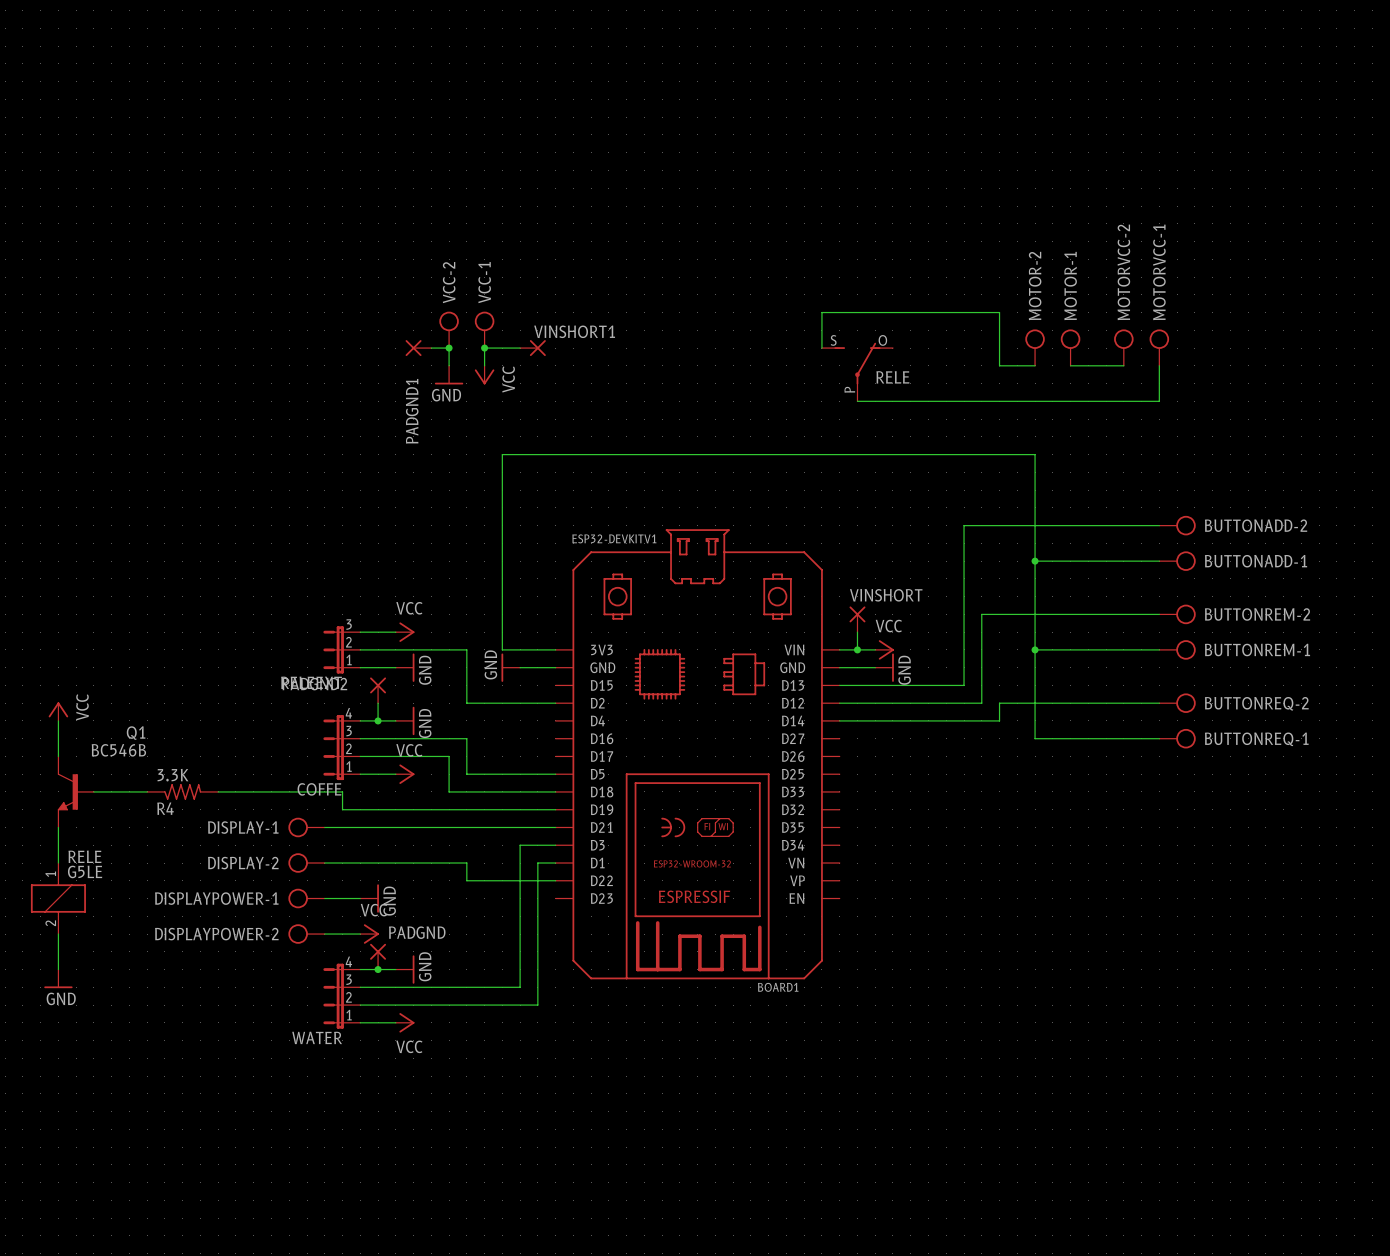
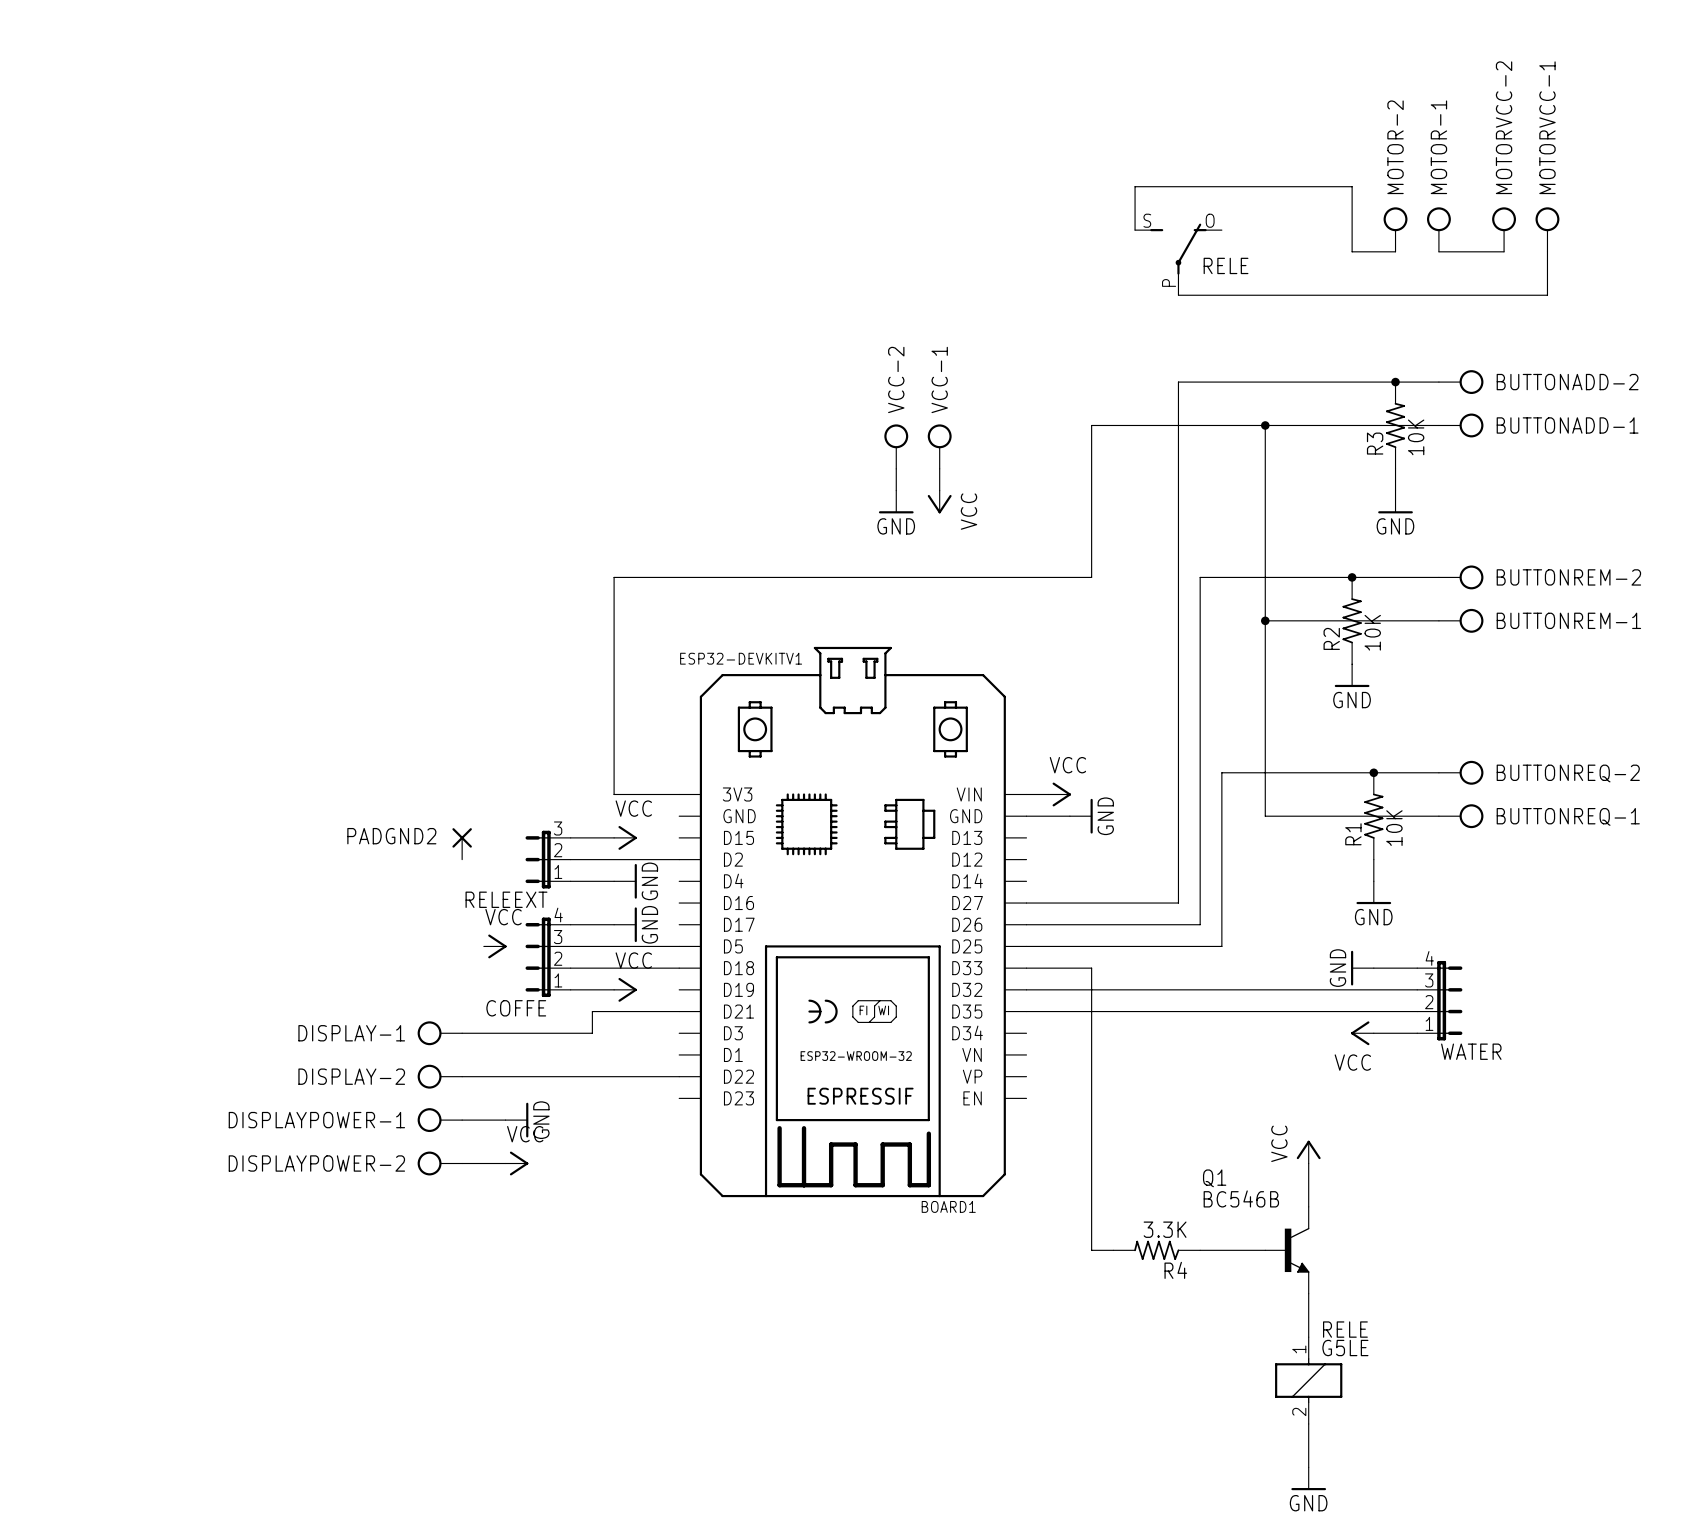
wire: none -> (1135, 230) (1135, 186) (1352, 186) (1352, 251) (1395, 251)
wire: none -> (1438, 251) (1504, 251)
wire: none -> (1547, 251) (1547, 295) (1178, 295)
RELE: none -> (1178, 259)
wire: (964, 312) (821, 312) (821, 348) -> (1178, 382) (1178, 642)
wire: (999, 312) (999, 365) (1035, 365) -> (1221, 382) (1438, 382)
junction: none -> (1395, 382)
VCC-2 position: (449, 329) -> (896, 446)
VCC-1 position: (484, 329) -> (939, 446)
MOTOR-2 position: (1035, 347) -> (1395, 229)
MOTOR-1 position: (1070, 347) -> (1438, 229)
MOTORVCC-2 position: (1123, 347) -> (1504, 229)
MOTORVCC-1 position: (1159, 347) -> (1547, 229)
PADGND1: (418, 348) -> none
wire: (431, 348) (449, 348) (449, 365) -> none
junction: (449, 348) -> none
junction: (484, 348) -> none
wire: (520, 348) (484, 348) (484, 365) -> none
VINSHORT1: (532, 348) -> none
wire: none -> (1265, 425) (1265, 555)
junction: none -> (1265, 425)
R3: none -> 10K (1395, 425)
wire: (1070, 365) (1123, 365) -> none
wire: (1159, 365) (1159, 401) (857, 401) -> none
RELE: (857, 372) -> none
power symbol: GND (449, 375) -> none
power symbol: VCC (484, 375) -> none
wire: none -> (896, 468) (896, 490)
wire: none -> (939, 468) (939, 490)
wire: none -> (1395, 468) (1395, 490)
power symbol: none -> GND (896, 501)
power symbol: none -> VCC (939, 501)
power symbol: none -> GND (1395, 501)
wire: (1035, 454) (502, 454) (502, 472) -> (1438, 425) (1091, 425) (1091, 577) (614, 577)
junction: none -> (1352, 577)
wire: none -> (1265, 620) (1438, 620)
junction: none -> (1265, 620)
R2: none -> 10K (1352, 620)
wire: (964, 525) (1159, 525) -> none
BUTTONADD-2 position: (1177, 525) -> (1461, 382)
power symbol: none -> GND (1352, 675)
wire: (1035, 561) (1159, 561) -> none
junction: (1035, 561) -> none
BUTTONADD-1 position: (1177, 561) -> (1461, 425)
wire: (981, 614) (1159, 614) -> (1200, 751) (1200, 577) (1438, 577)
BUTTONREM-2 position: (1177, 614) -> (1461, 577)
VINSHORT: (857, 619) -> none
wire: (360, 632) (395, 632) -> (570, 837) (614, 837)
power symbol: VCC (405, 632) -> none
wire: (857, 632) (857, 649) (875, 649) -> none
junction: none -> (1373, 772)
RELEEXT position: (341, 649) -> (548, 859)
wire: (360, 649) (466, 649) (466, 703) -> none
junction: (857, 649) -> none
power symbol position: VCC (884, 649) -> VCC (1059, 794)
wire: (1035, 649) (1159, 649) -> none
junction: (1035, 649) -> none
BUTTONREM-1 position: (1177, 649) -> (1461, 620)
wire: (360, 667) (395, 667) -> (570, 881) (614, 881)
power symbol: GND (405, 667) -> none
power symbol: GND (510, 667) -> none
wire: (520, 667) (555, 667) -> (570, 924) (614, 924)
wire: (1035, 667) (1035, 738) (1159, 738) -> (1265, 816) (1438, 816)
R1: none -> 10K (1373, 816)
power symbol: none -> VCC (625, 837)
wire: (839, 685) (964, 685) -> (1026, 903) (1178, 903) (1178, 837)
wire: (378, 703) (378, 720) -> none
wire: (839, 703) (981, 703) -> (1026, 924) (1200, 924) (1200, 859)
wire: (999, 703) (1159, 703) -> (1221, 859) (1221, 772) (1438, 772)
wire: none -> (1373, 859) (1373, 881)
BUTTONREQ-2 position: (1177, 703) -> (1461, 772)
power symbol: VCC (58, 711) -> none
wire: (58, 720) (58, 756) -> none
wire: (360, 720) (395, 720) -> none
junction: (378, 720) -> none
power symbol: GND (405, 720) -> none
power symbol: none -> GND (625, 881)
wire: (839, 720) (999, 720) -> (1026, 946) (1221, 946) (1221, 881)
power symbol: none -> GND (1373, 892)
wire: (360, 738) (466, 738) (466, 774) -> none
BUTTONREQ-1 position: (1177, 738) -> (1461, 816)
COFFE position: (341, 747) -> (548, 957)
wire: (360, 756) (449, 756) (449, 791) (466, 791) -> none
power symbol: none -> GND (625, 924)
wire: (360, 774) (395, 774) -> none
Q1 flip: as is (67, 791) -> left-right (1297, 1250)
Q1 position: (75, 791) -> (1287, 1250)
wire: (93, 791) (147, 791) -> none
R4 flip: as is (182, 791) -> left-right (1156, 1250)
R4 position: (182, 791) -> (1156, 1250)
wire: (218, 791) (342, 791) (342, 809) (466, 809) -> none
wire: none -> (1026, 968) (1091, 968) (1091, 1250) (1113, 1250)
power symbol: none -> GND (1362, 968)
wire: none -> (1373, 968) (1417, 968)
wire: (502, 809) (555, 809) -> none
power symbol: none -> VCC (625, 989)
wire: none -> (1026, 989) (1417, 989)
WATER: none -> (1439, 1000)
wire: (58, 827) (58, 863) -> none
DISPLAY-1 position: (306, 827) -> (439, 1033)
wire: (324, 827) (484, 827) -> (462, 1033) (592, 1033) (592, 1011)
wire: none -> (1026, 1011) (1417, 1011)
wire: (555, 845) (520, 845) (520, 987) (360, 987) -> none
power symbol: none -> VCC (1362, 1033)
wire: none -> (1373, 1033) (1417, 1033)
DISPLAY-2 position: (306, 863) -> (439, 1076)
wire: (324, 863) (466, 863) (466, 880) -> (462, 1076) (570, 1076)
wire: (555, 863) (537, 863) (537, 1005) (360, 1005) -> none
RELE: G5LE (58, 898) -> none
DISPLAYPOWER-1 position: (306, 898) -> (439, 1120)
wire: (324, 898) (360, 898) -> (462, 1120) (505, 1120)
power symbol: GND (369, 898) -> none
power symbol: none -> GND (516, 1120)
wire: (58, 934) (58, 969) -> none
DISPLAYPOWER-2 position: (306, 934) -> (439, 1163)
wire: (324, 934) (360, 934) -> (462, 1163) (505, 1163)
power symbol: VCC (369, 934) -> none
power symbol: none -> VCC (1308, 1152)
power symbol: none -> VCC (516, 1163)
wire: none -> (1308, 1163) (1308, 1206)
PADGND: (378, 956) -> none
wire: (360, 969) (395, 969) -> none
junction: (378, 969) -> none
power symbol: GND (405, 969) -> none
power symbol: GND (58, 978) -> none
WATER: (341, 996) -> none
wire: (360, 1022) (395, 1022) -> none
power symbol: VCC (405, 1022) -> none
wire: none -> (1200, 1250) (1265, 1250)
wire: none -> (1308, 1293) (1308, 1337)
RELE: none -> G5LE (1308, 1380)
wire: none -> (1308, 1423) (1308, 1467)
power symbol: none -> GND (1308, 1478)

